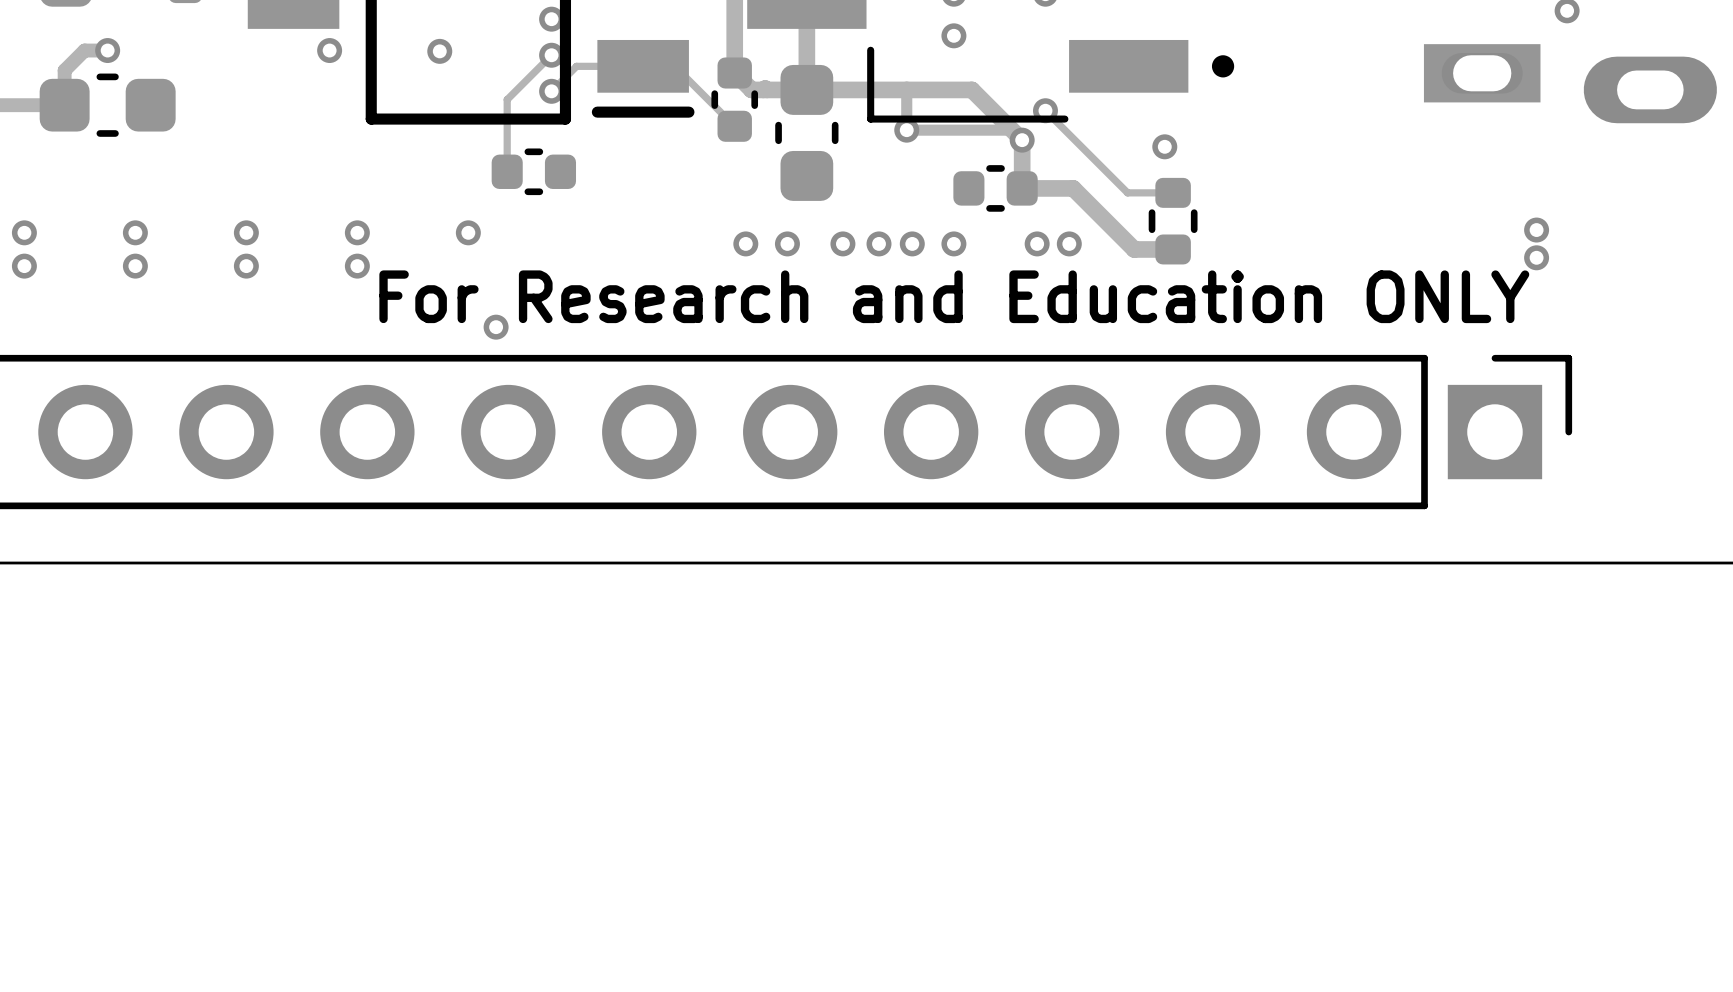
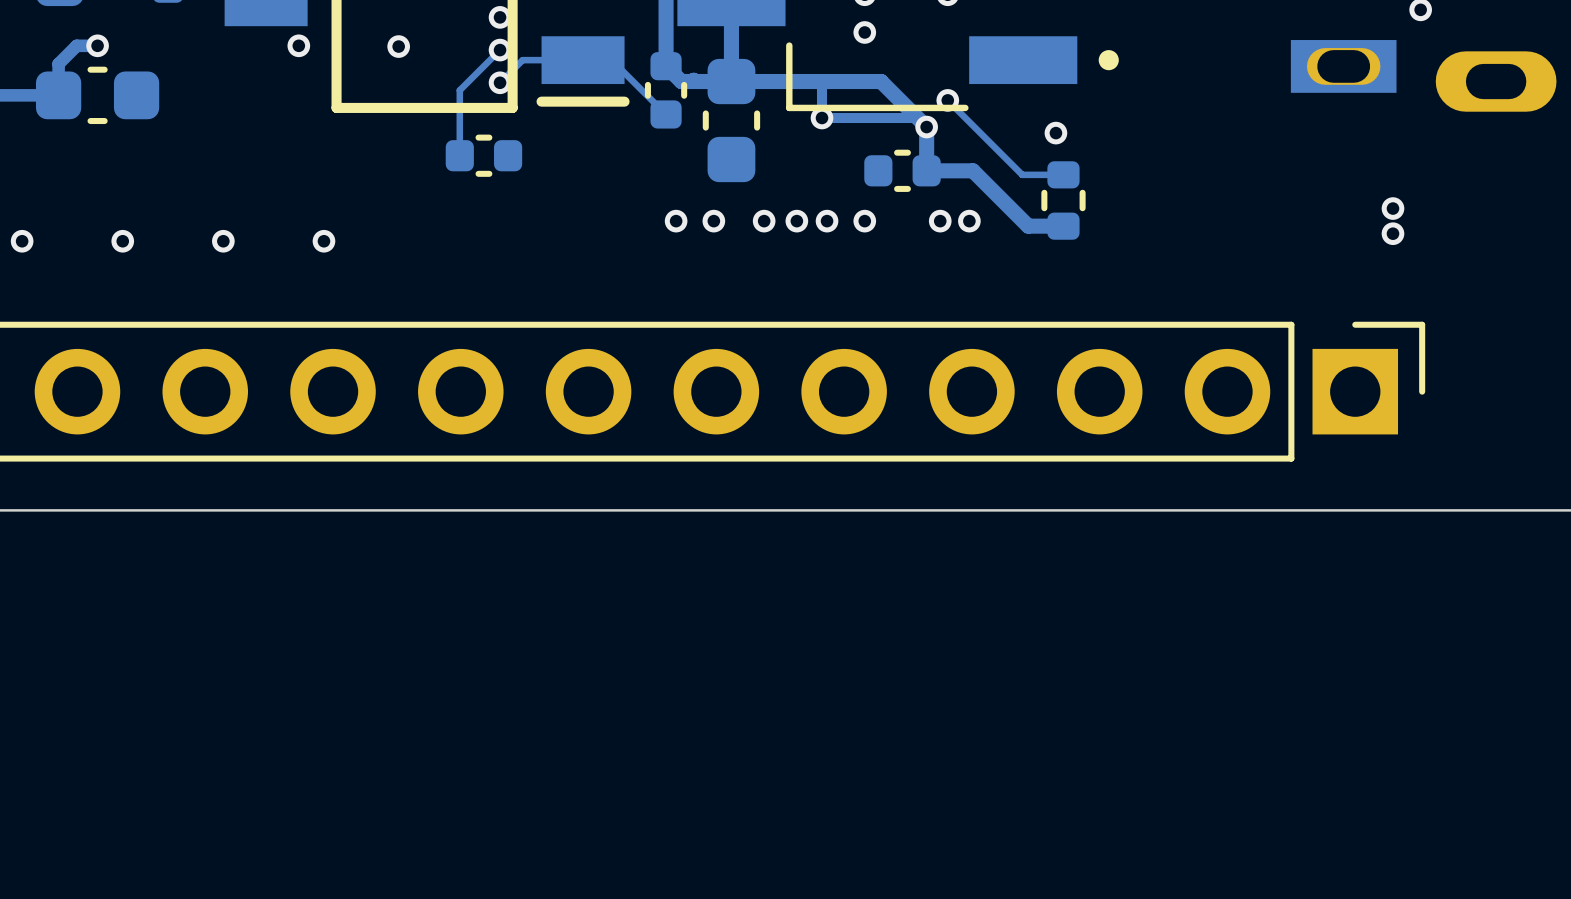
via: (24, 232) -> none
via: (135, 232) -> none
via: (246, 232) -> none
via: (357, 232) -> none
via: (468, 232) -> none
text: For Research and Education ONLY (954, 296) -> none
via: (496, 327) -> none

